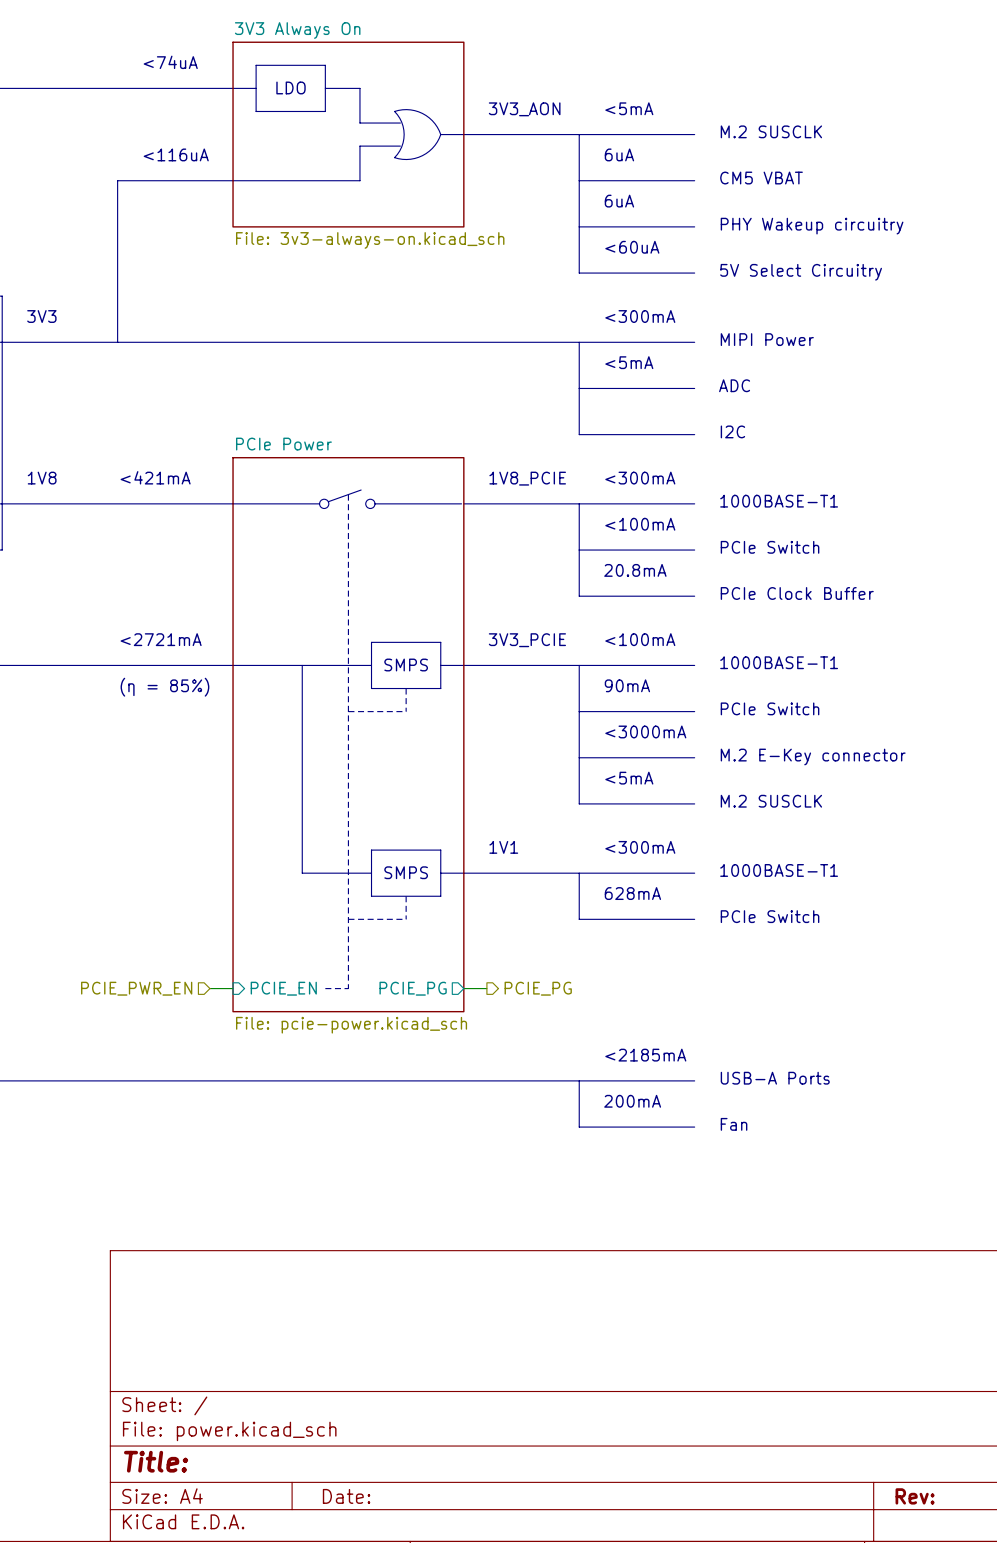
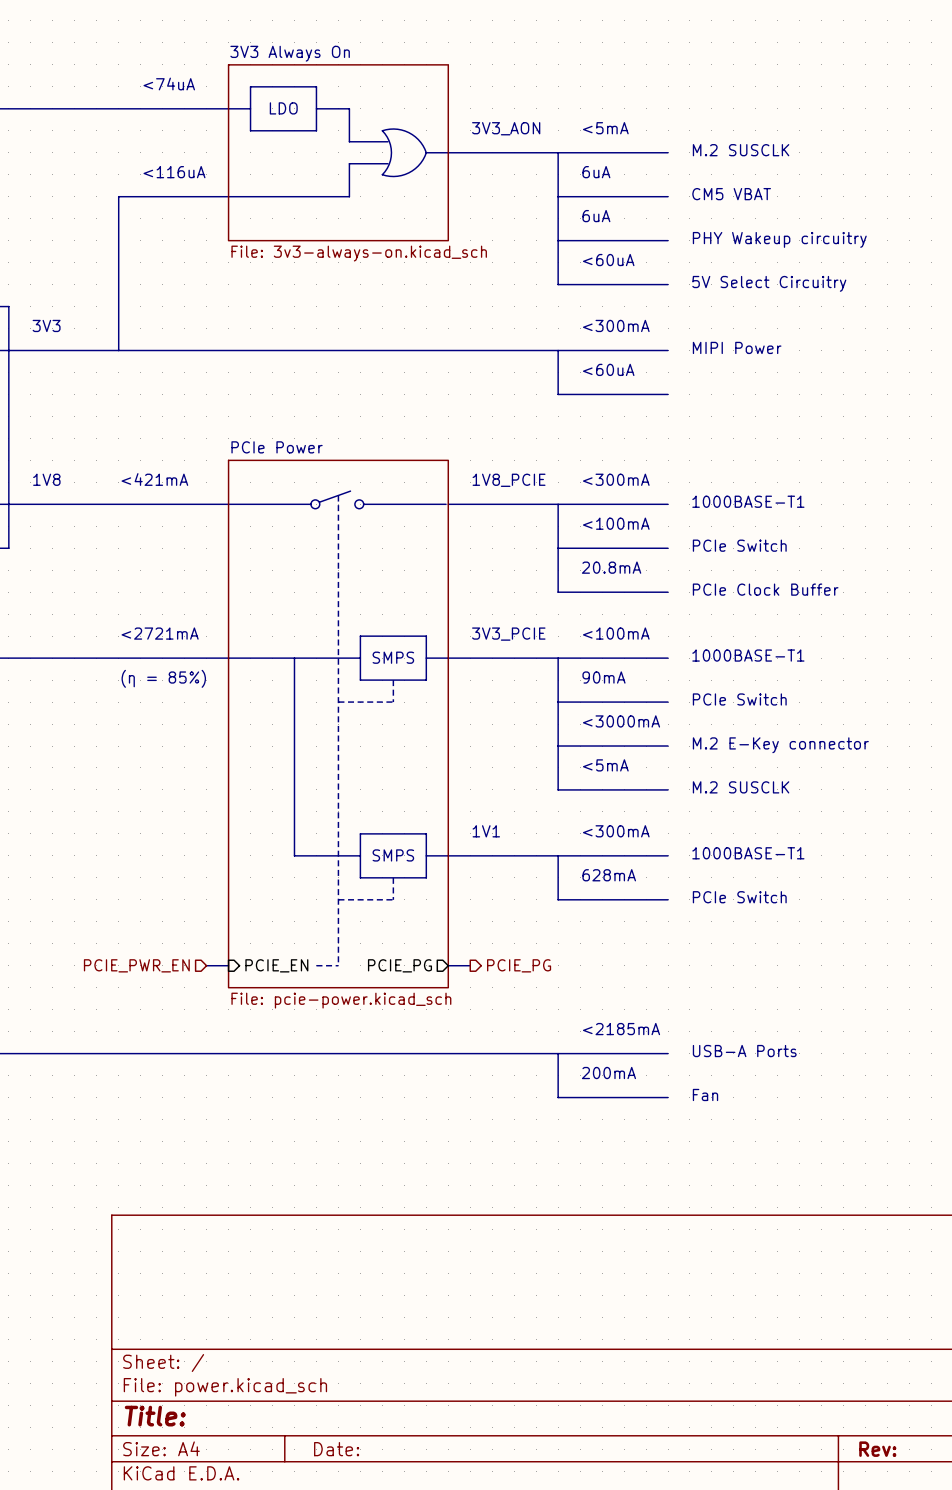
text: <5mA (629, 362) -> <60uA (608, 369)
text: ADC (734, 385) -> none
line: (579, 388) (579, 434) (694, 434) -> none
text: I2C (732, 431) -> none

